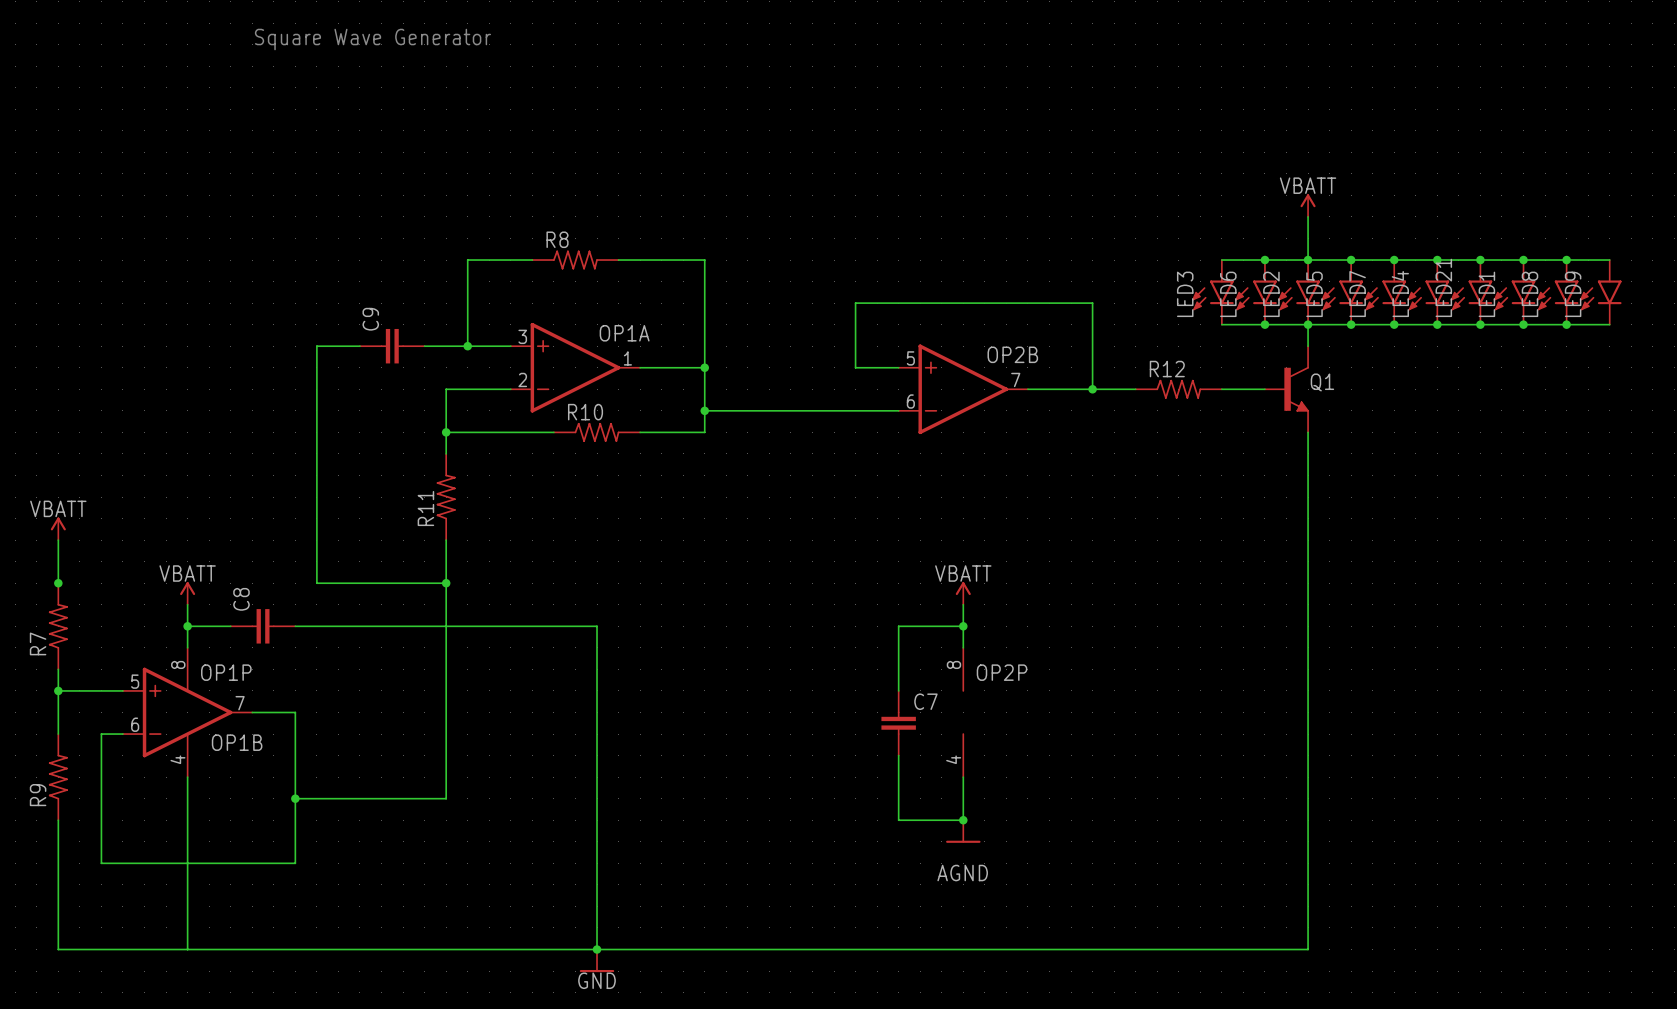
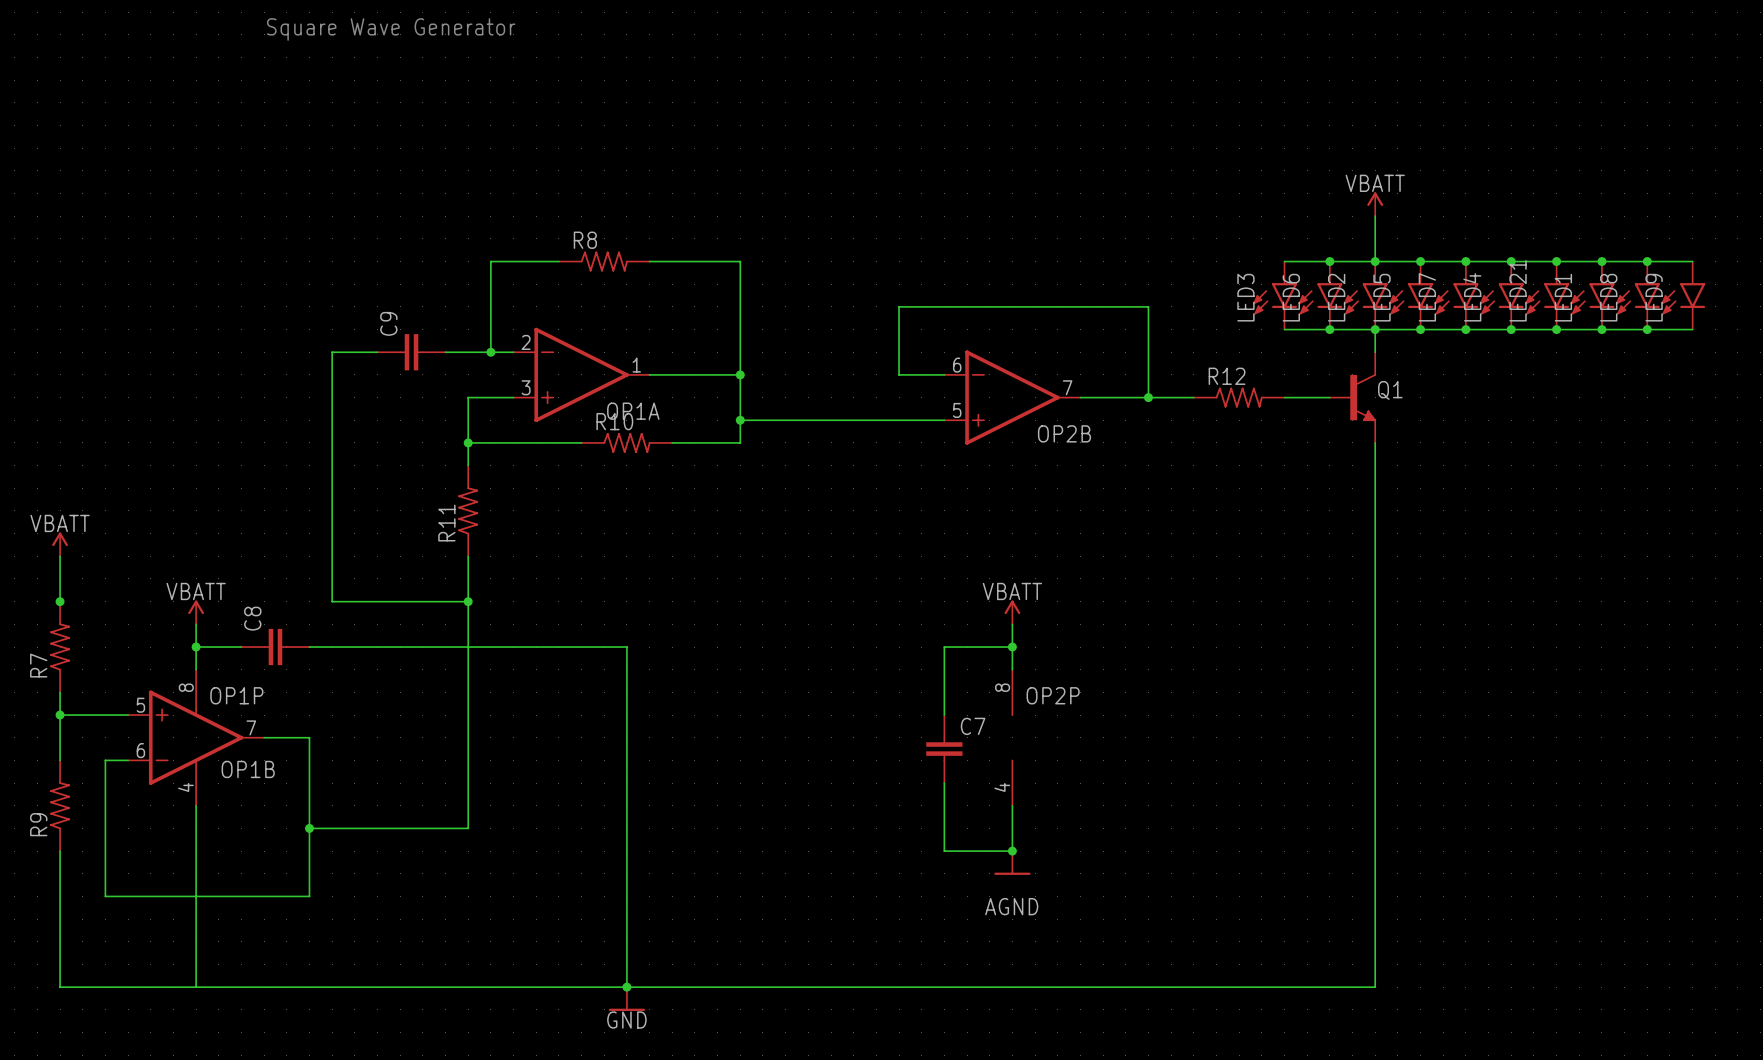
OP1A flip: as is (575, 367) -> up-down (581, 374)
OP2B flip: as is (963, 389) -> up-down (1012, 397)

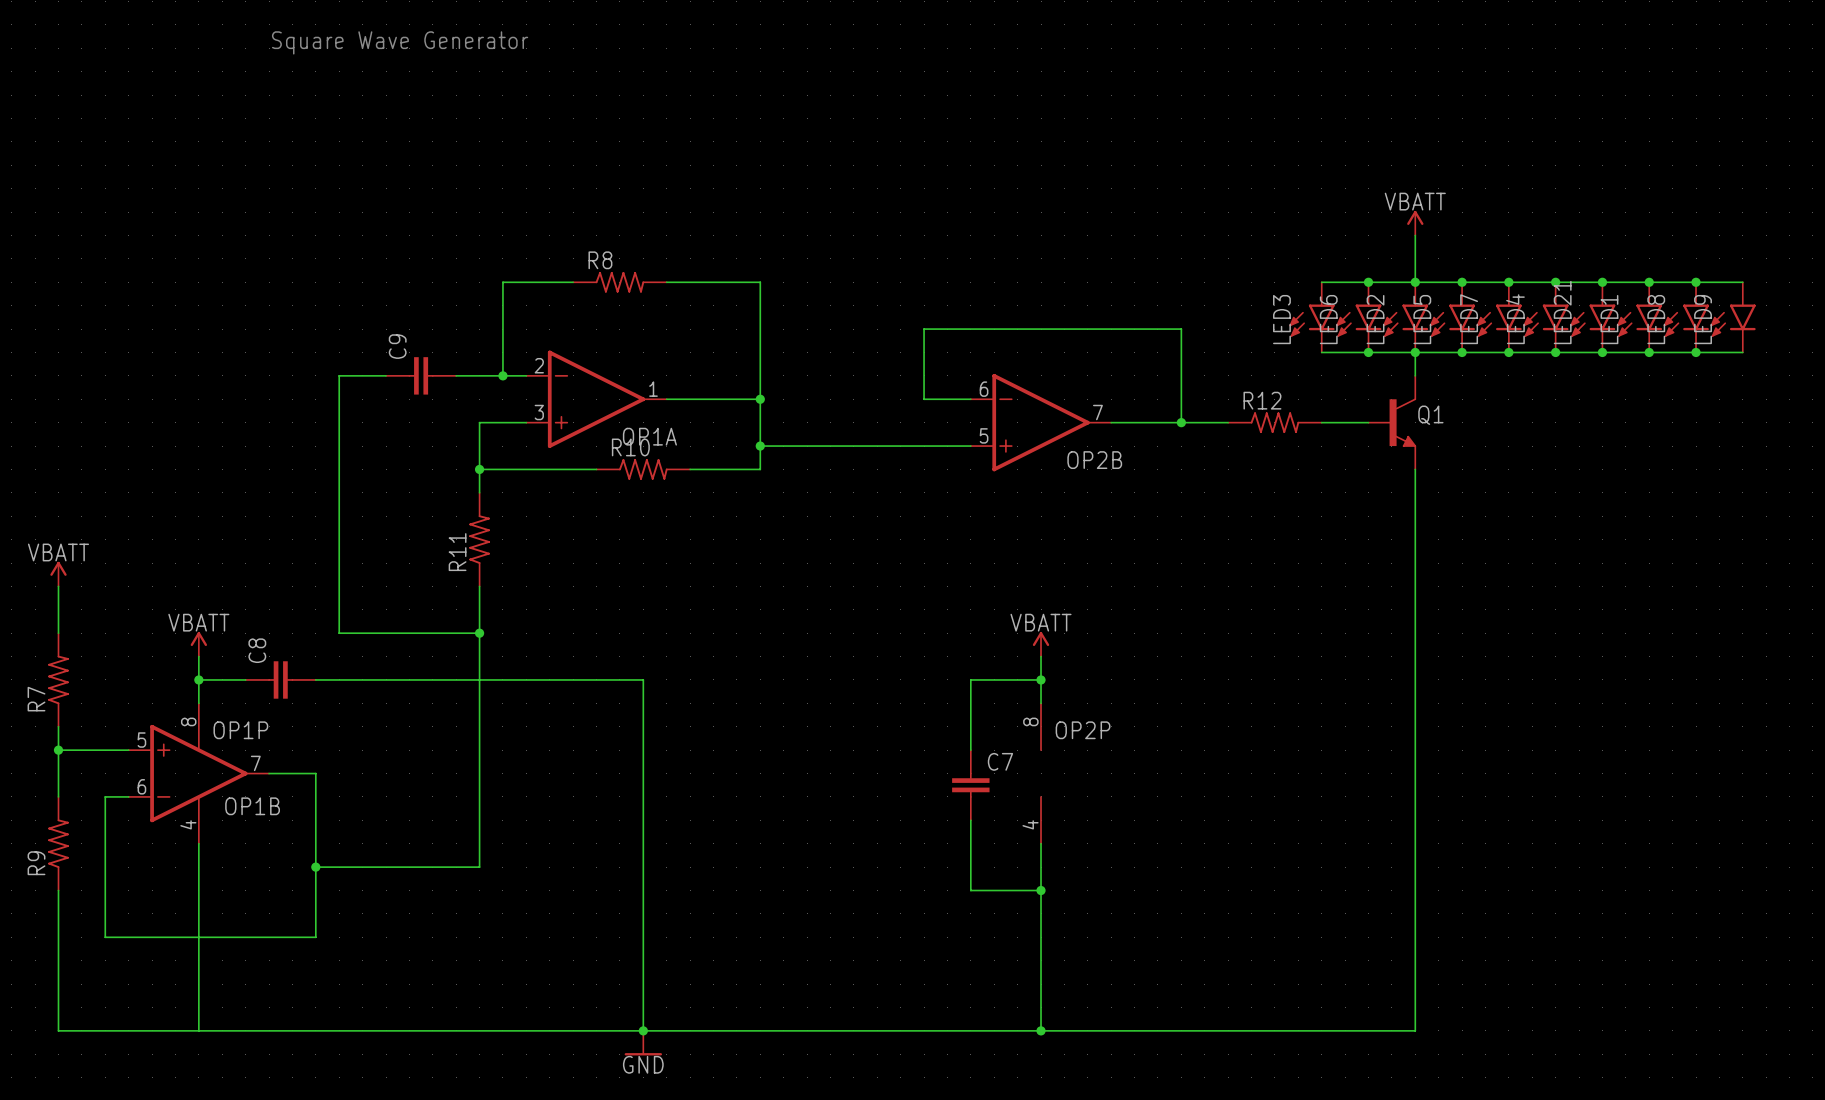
junction: (60, 601) -> none
wire: none -> (1041, 890) (1041, 1030)
power symbol: AGND (1012, 863) -> none
junction: none -> (1041, 1030)

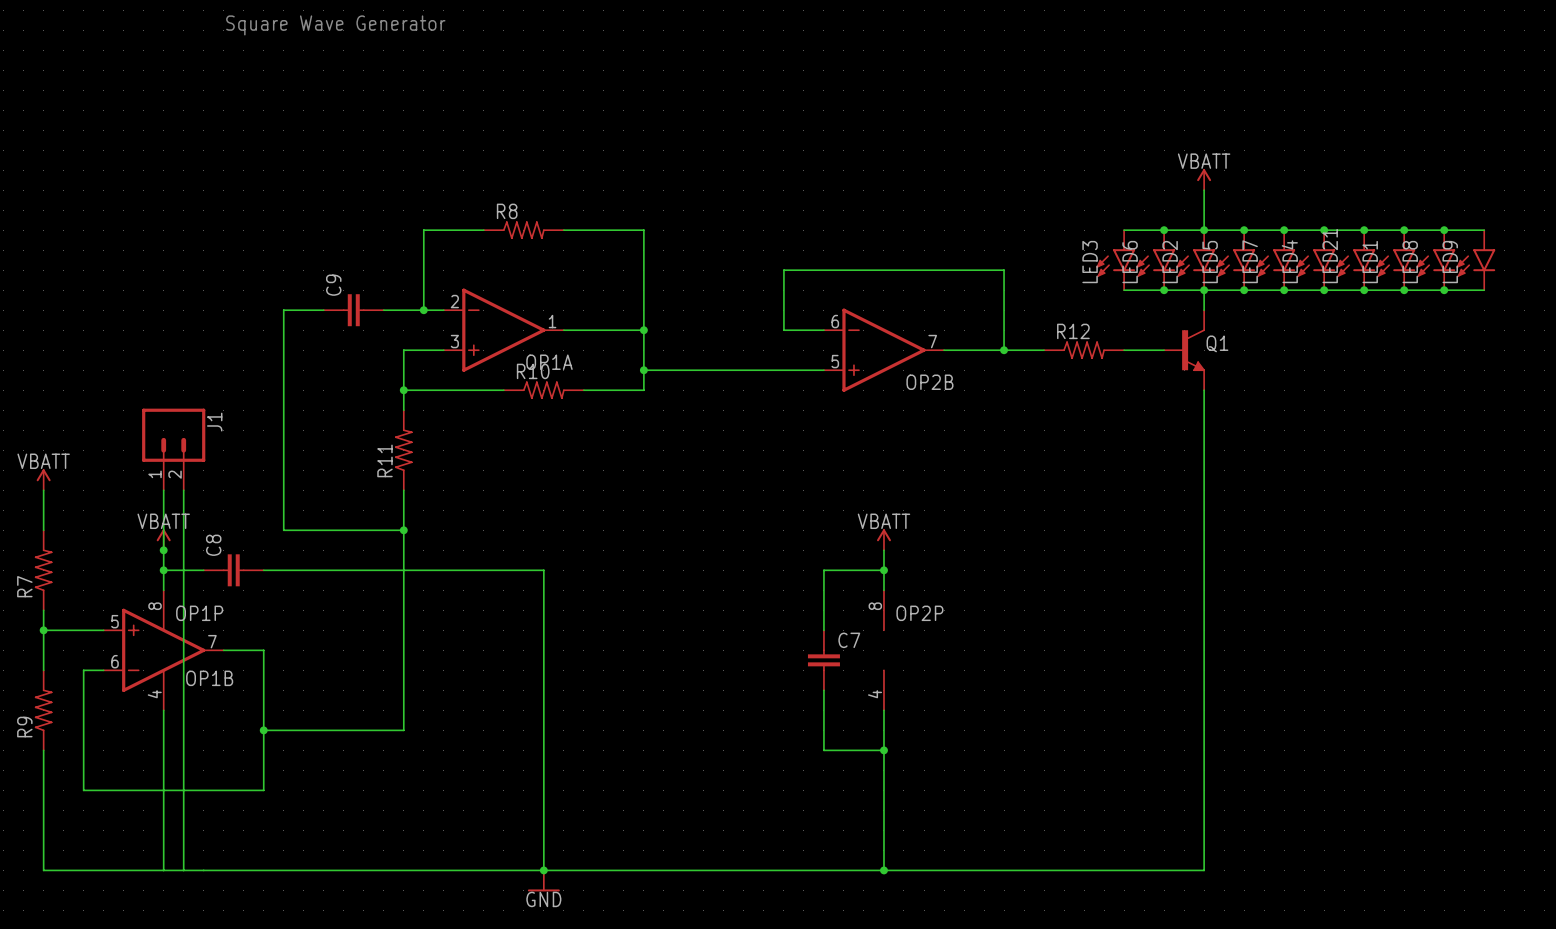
J1: none -> (173, 449)
wire: none -> (163, 490) (163, 550)
wire: none -> (183, 490) (183, 870)
junction: none -> (163, 550)

